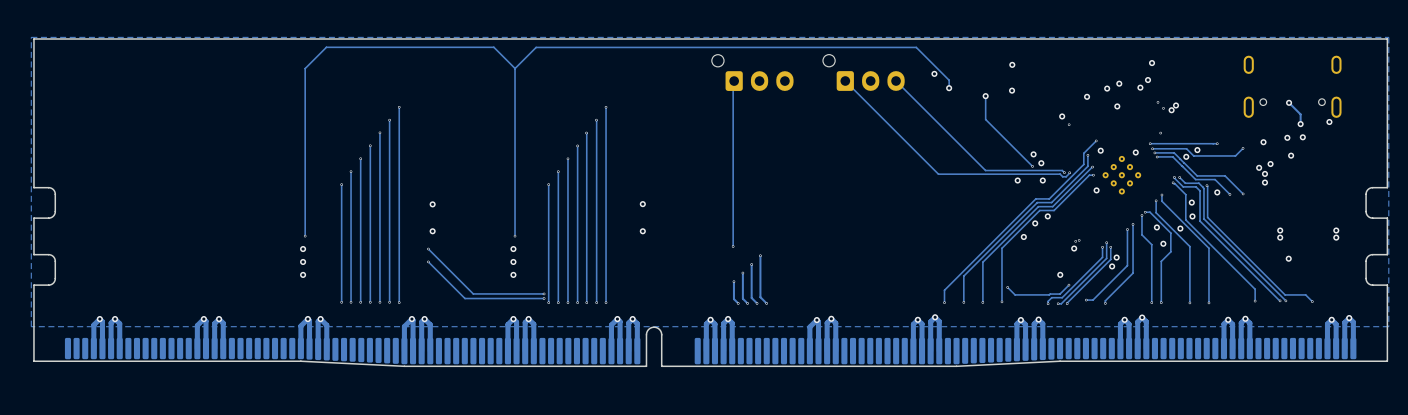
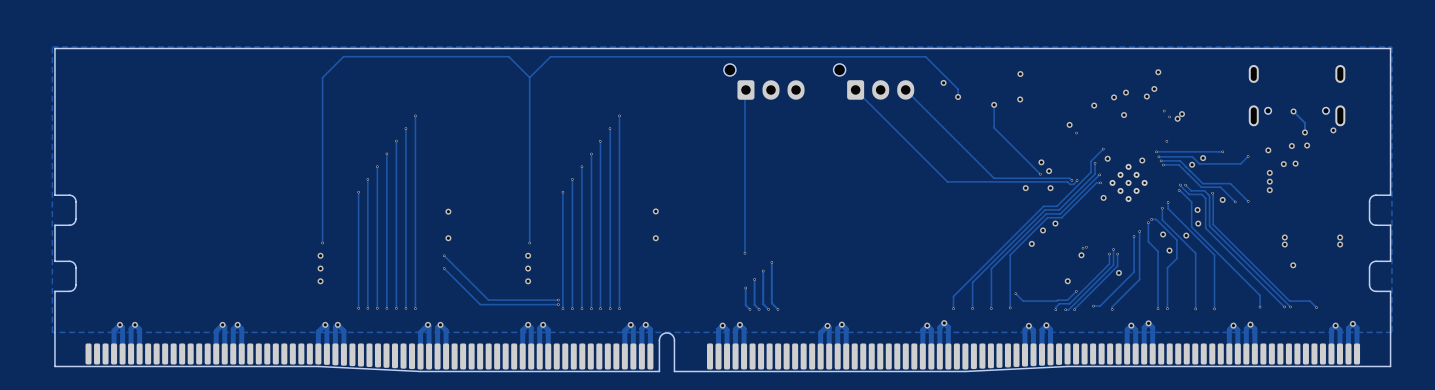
via: none -> (1283, 164)
via: (1270, 164) -> none
via: none -> (1269, 172)
via: (1259, 167) -> none
via: (1116, 257) -> none

